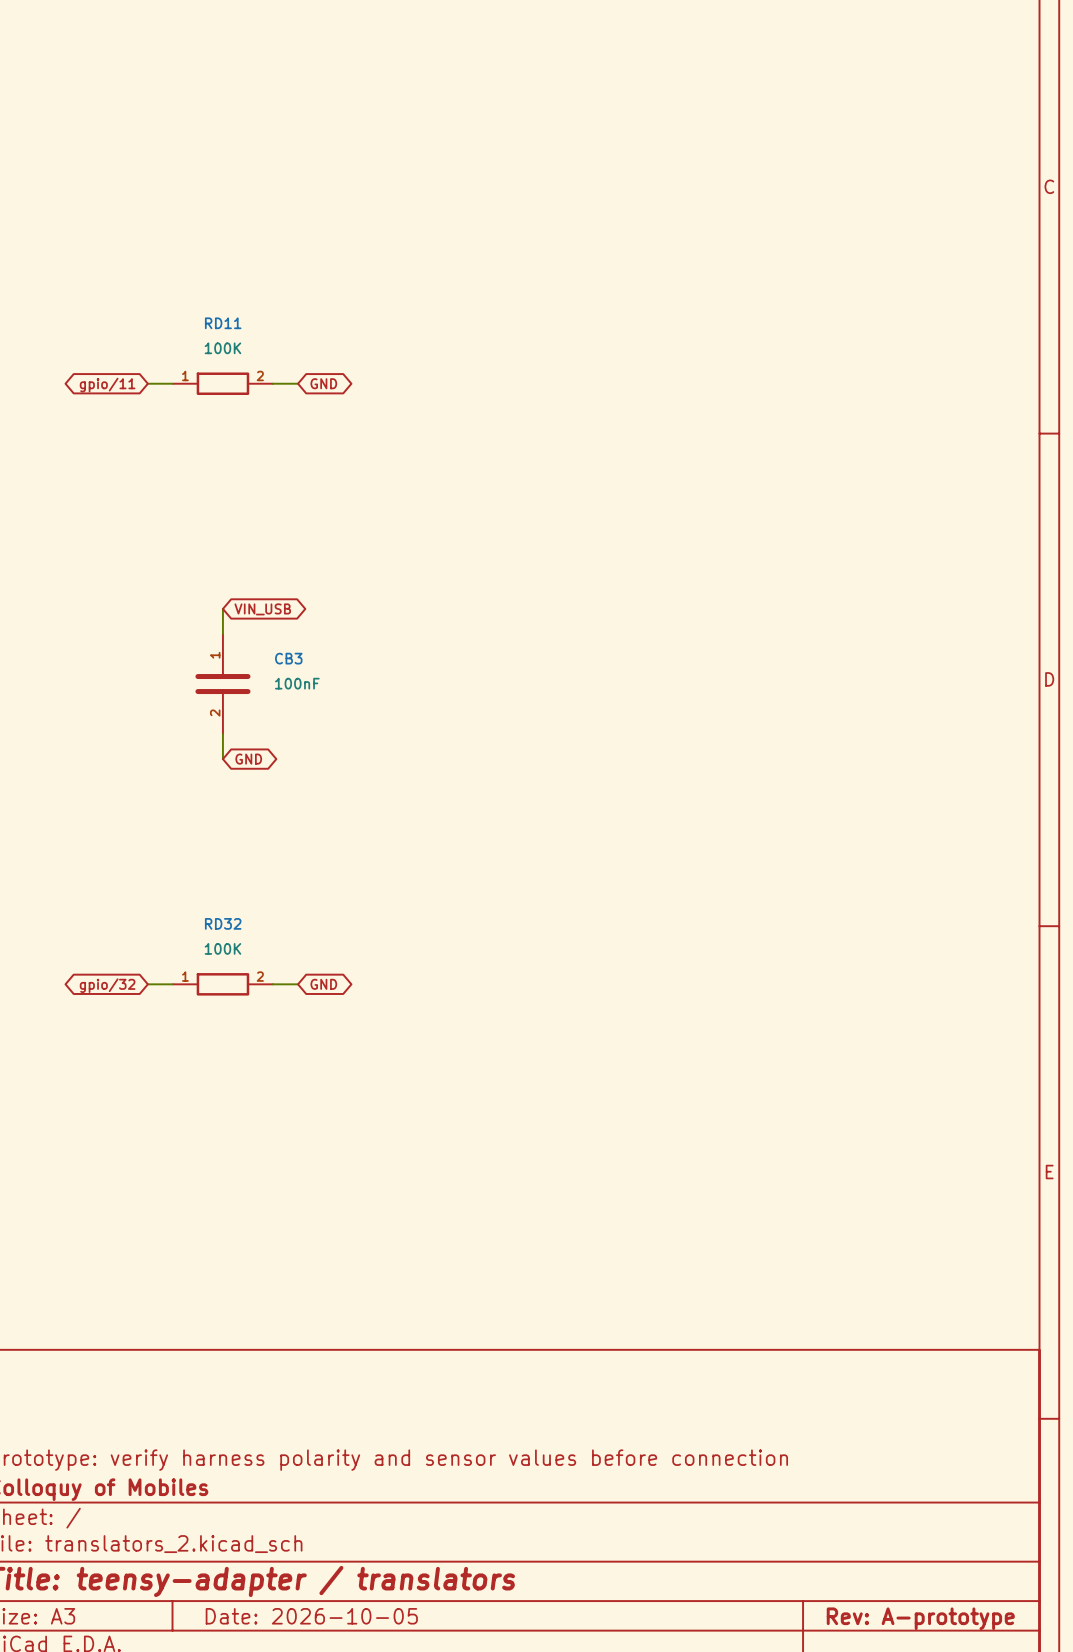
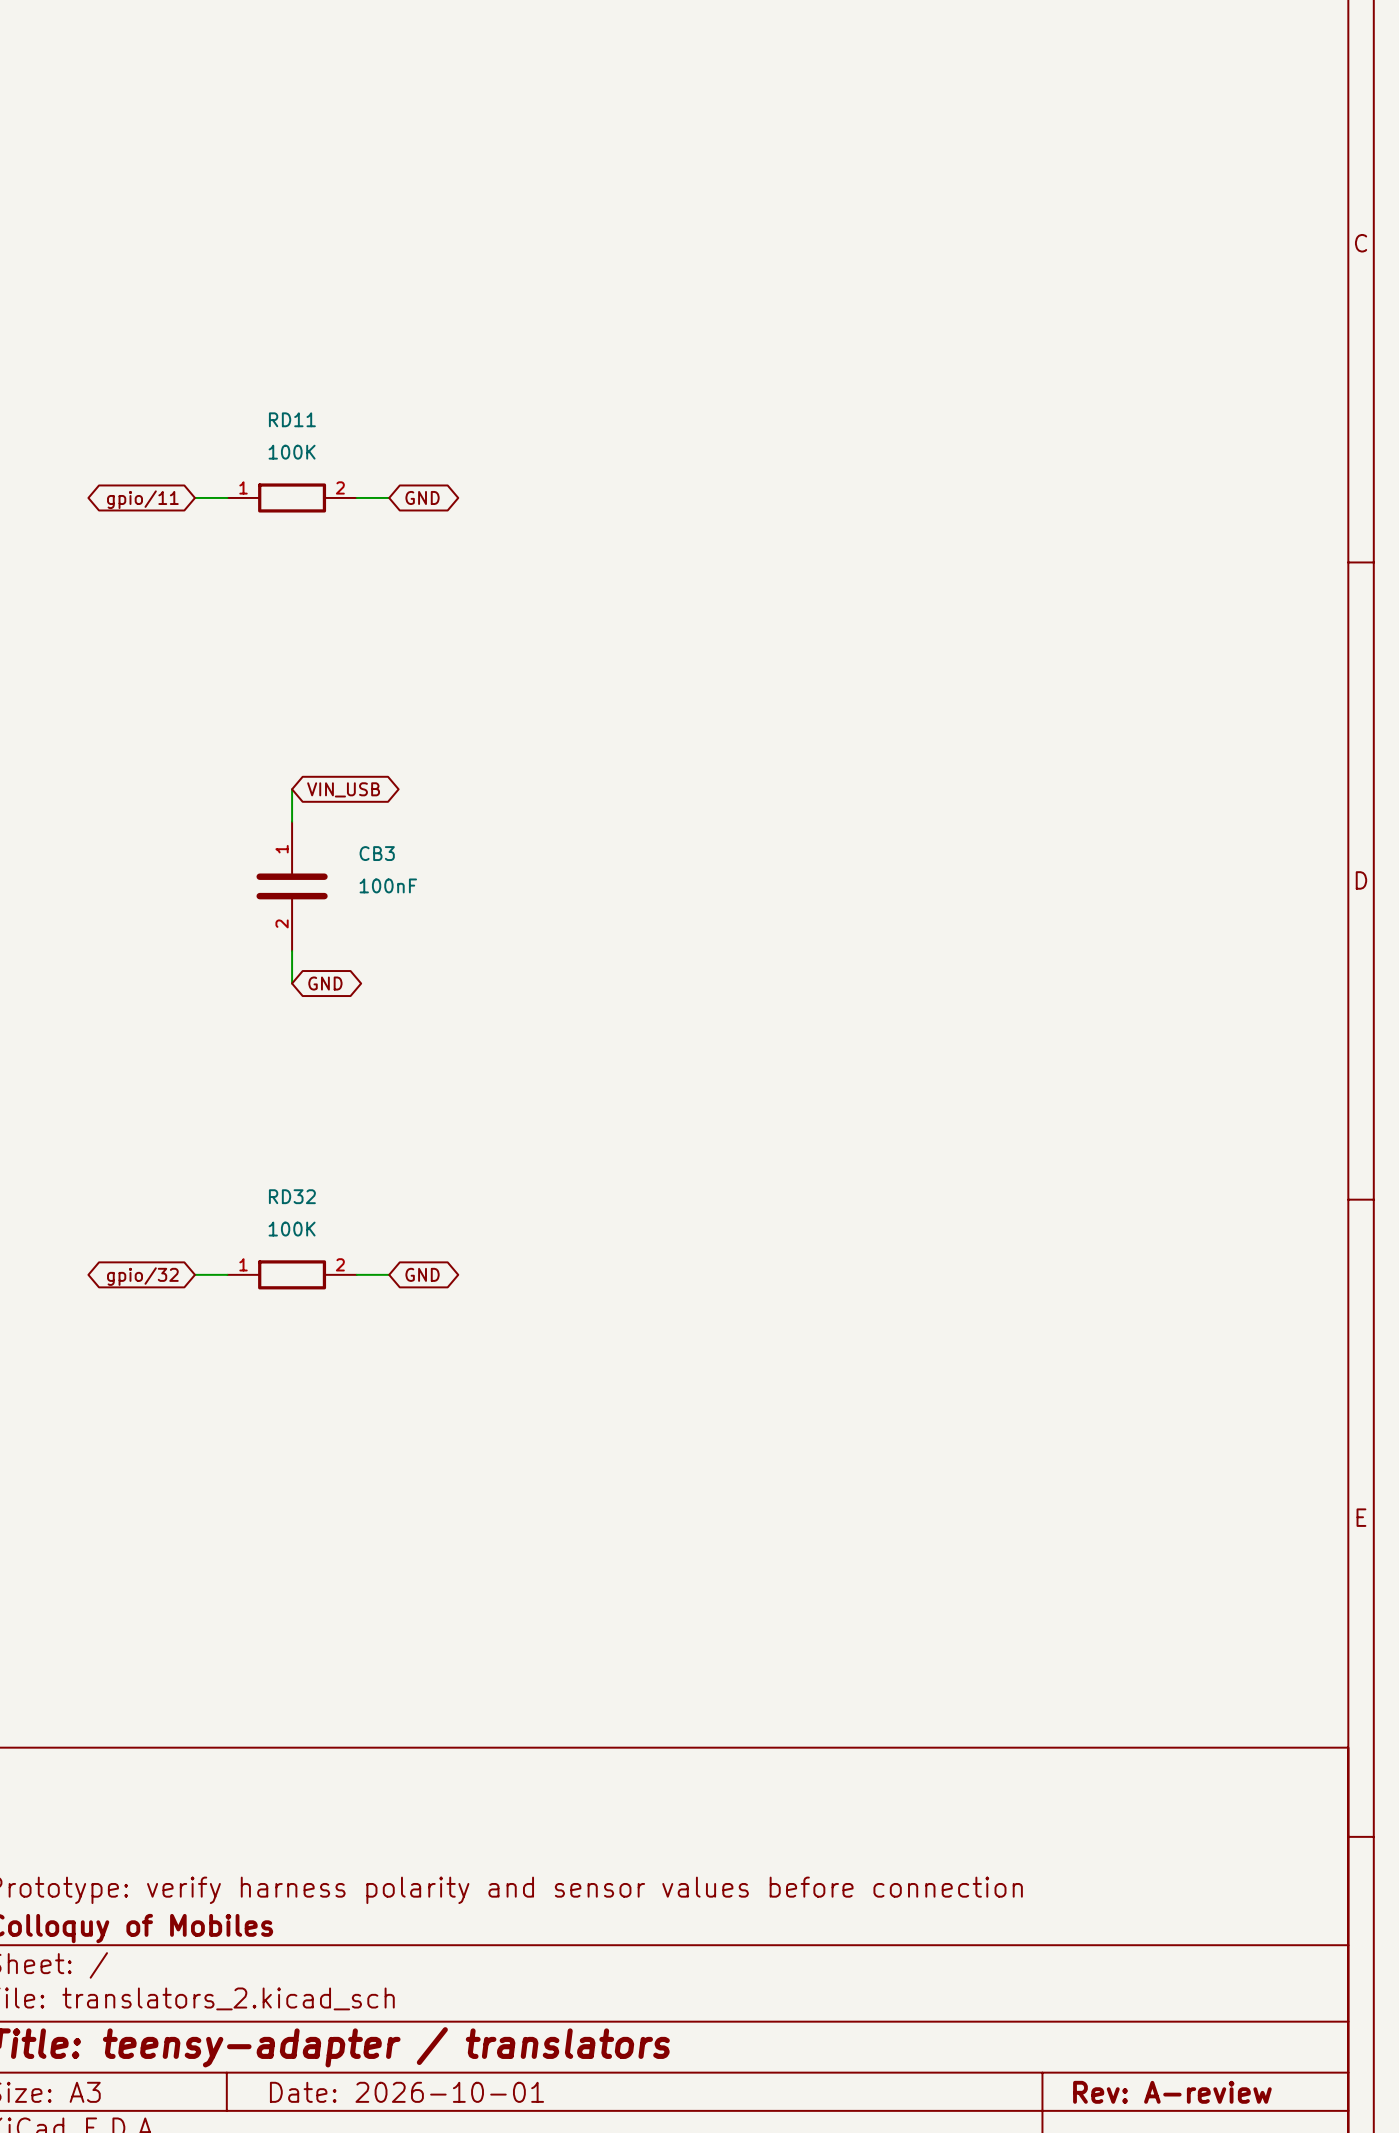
title block: Date: 2026-10-05 (311, 1616) -> Date: 2026-10-01 (406, 2092)
title block: Rev: A-prototype (920, 1618) -> Rev: A-review (1172, 2092)

